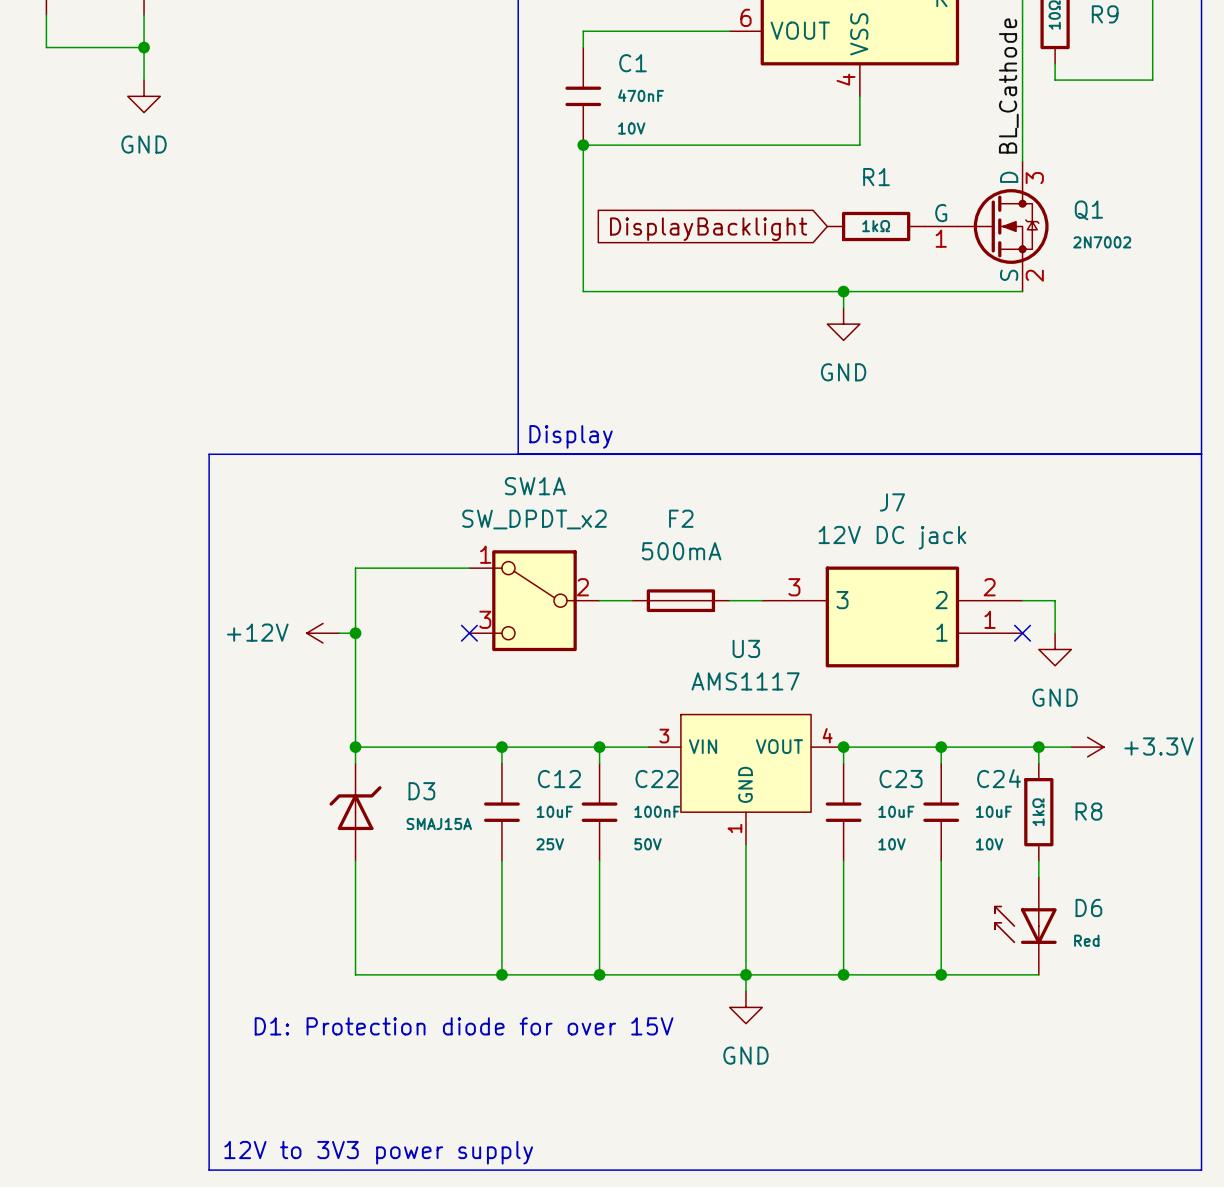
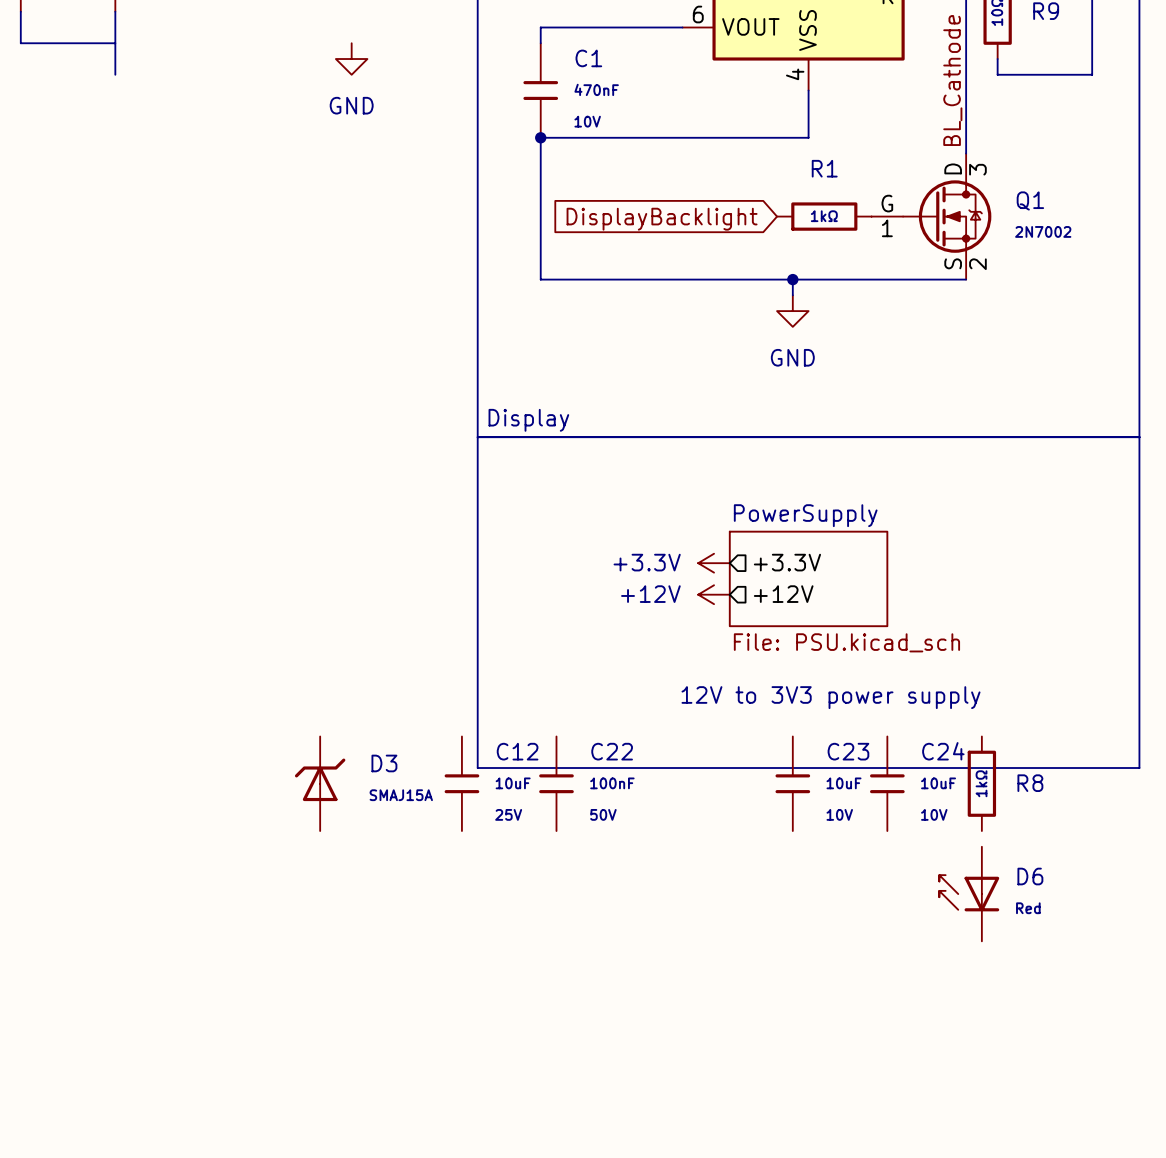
junction: (144, 47) -> none
power symbol position: GND (144, 96) -> GND (351, 59)
line: (518, 454) (209, 454) (209, 1170) (1201, 1170) (1201, 795) -> (477, 437) (477, 768) (1139, 768)
wire: (469, 568) (355, 568) (355, 763) -> none
sheet pin: none -> +3.3V (787, 562)
power symbol: none -> +3.3V (714, 563)
SW1A: SW_DPDT_x2 (534, 600) -> none
wire: (599, 600) (632, 600) -> none
F2: 500mA (680, 600) -> none
wire: (729, 600) (762, 600) -> none
sheet PowerSupply: none -> File: PSU.kicad_sch (808, 578)
wire: (1022, 600) (1055, 600) (1055, 633) -> none
power symbol: none -> +12V (714, 594)
sheet pin: none -> +12V (783, 594)
J7: 12V DC jack (892, 616) -> none
power symbol: +12V (322, 633) -> none
wire: (339, 633) (355, 633) -> none
junction: (355, 633) -> none
no-connect mark: (469, 633) -> none
no-connect mark: (1022, 633) -> none
power symbol: GND (1055, 649) -> none
text: none -> 12V to 3V3 power supply (831, 697)
wire: (355, 747) (648, 747) -> none
junction: (355, 747) -> none
wire: (501, 747) (501, 763) -> none
junction: (501, 747) -> none
wire: (599, 747) (599, 763) -> none
junction: (599, 747) -> none
junction: (843, 747) -> none
wire: (941, 747) (941, 763) -> none
junction: (941, 747) -> none
wire: (1038, 747) (1038, 763) -> none
junction: (1038, 747) -> none
wire: (1071, 747) (843, 747) (843, 763) -> none
power symbol: +3.3V (1087, 747) -> none
U3: AMS1117 (745, 779) -> none
wire: (745, 844) (745, 991) -> none
wire: (355, 860) (355, 974) (1038, 974) -> none
wire: (501, 860) (501, 974) -> none
wire: (599, 860) (599, 974) -> none
wire: (843, 860) (843, 974) -> none
wire: (941, 860) (941, 974) -> none
wire: (1038, 860) (1038, 877) -> none
junction: (501, 974) -> none
junction: (599, 974) -> none
junction: (745, 974) -> none
junction: (843, 974) -> none
junction: (941, 974) -> none
power symbol: GND (745, 1007) -> none
text: D1: Protection diode for over 15V (464, 1026) -> none
text: 12V to 3V3 power supply (378, 1152) -> none

